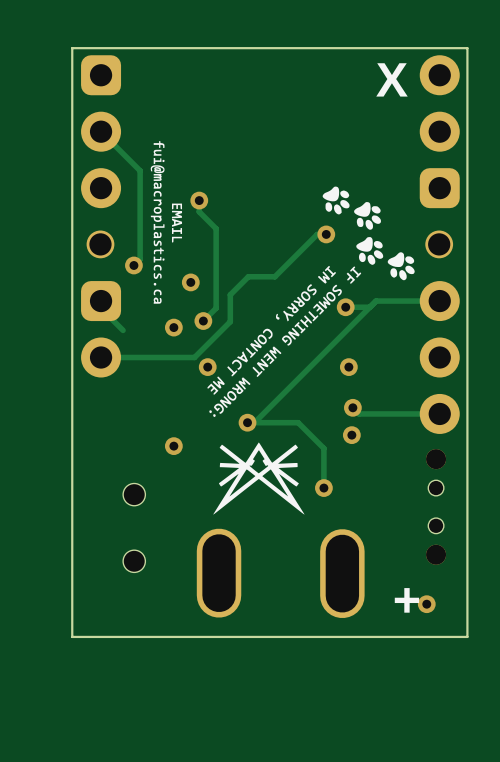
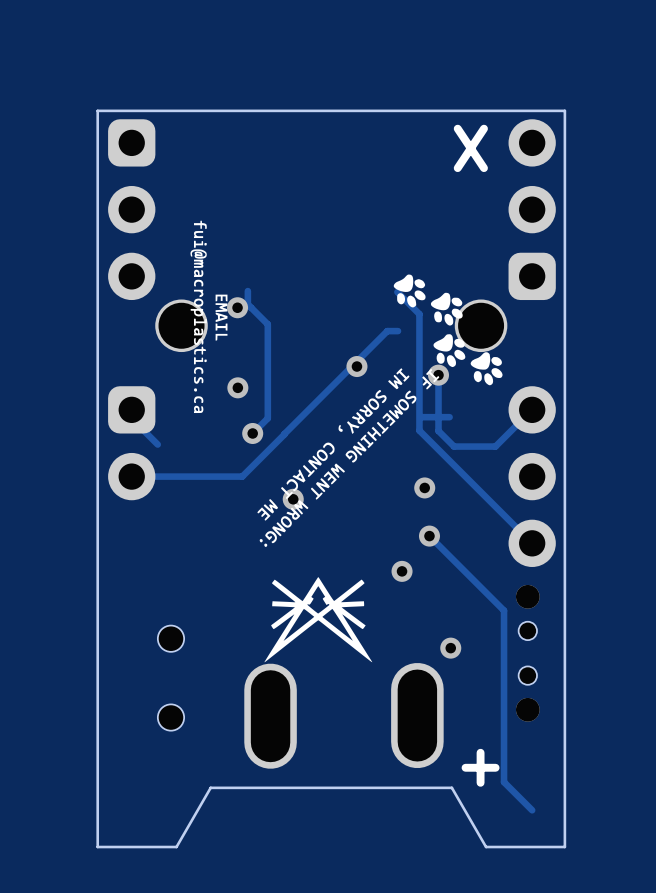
track: (101, 131) (140, 170) (140, 259) (133, 265) -> none
via position: (199, 200) -> (237, 307)
part: none -> (181, 325)
part: none -> (481, 325)
via: (326, 234) -> none
part: (100, 244) -> none
part: (439, 244) -> none
via: none -> (356, 366)
via: (133, 265) -> none
via: none -> (438, 375)
track: (274, 276) (248, 276) (230, 294) (230, 321) -> (337, 381) (284, 433)
track: (439, 301) (376, 301) (254, 422) -> (532, 409) (495, 446) (454, 446) (438, 430) (438, 375)
via: (345, 307) -> none
via: (173, 327) -> none
via: (207, 367) -> none
via: none -> (293, 499)
track: none -> (436, 543) (504, 610) (504, 782) (532, 810)
track: (439, 413) (359, 413) -> (532, 543) (419, 430) (419, 314) (397, 292)
track: (247, 422) (298, 422) (323, 448) (323, 488) -> none
via: (247, 422) -> none
via position: (351, 435) -> (402, 571)
via: (173, 446) -> none
via: (323, 488) -> none
via: none -> (450, 648)
part position: (219, 573) -> (270, 716)
part position: (342, 573) -> (417, 715)
via: (426, 604) -> none
board edge: (467, 636) (72, 636) -> (564, 806) (564, 847) (486, 847) (451, 787) (210, 787) (176, 847) (97, 847) (97, 806)

